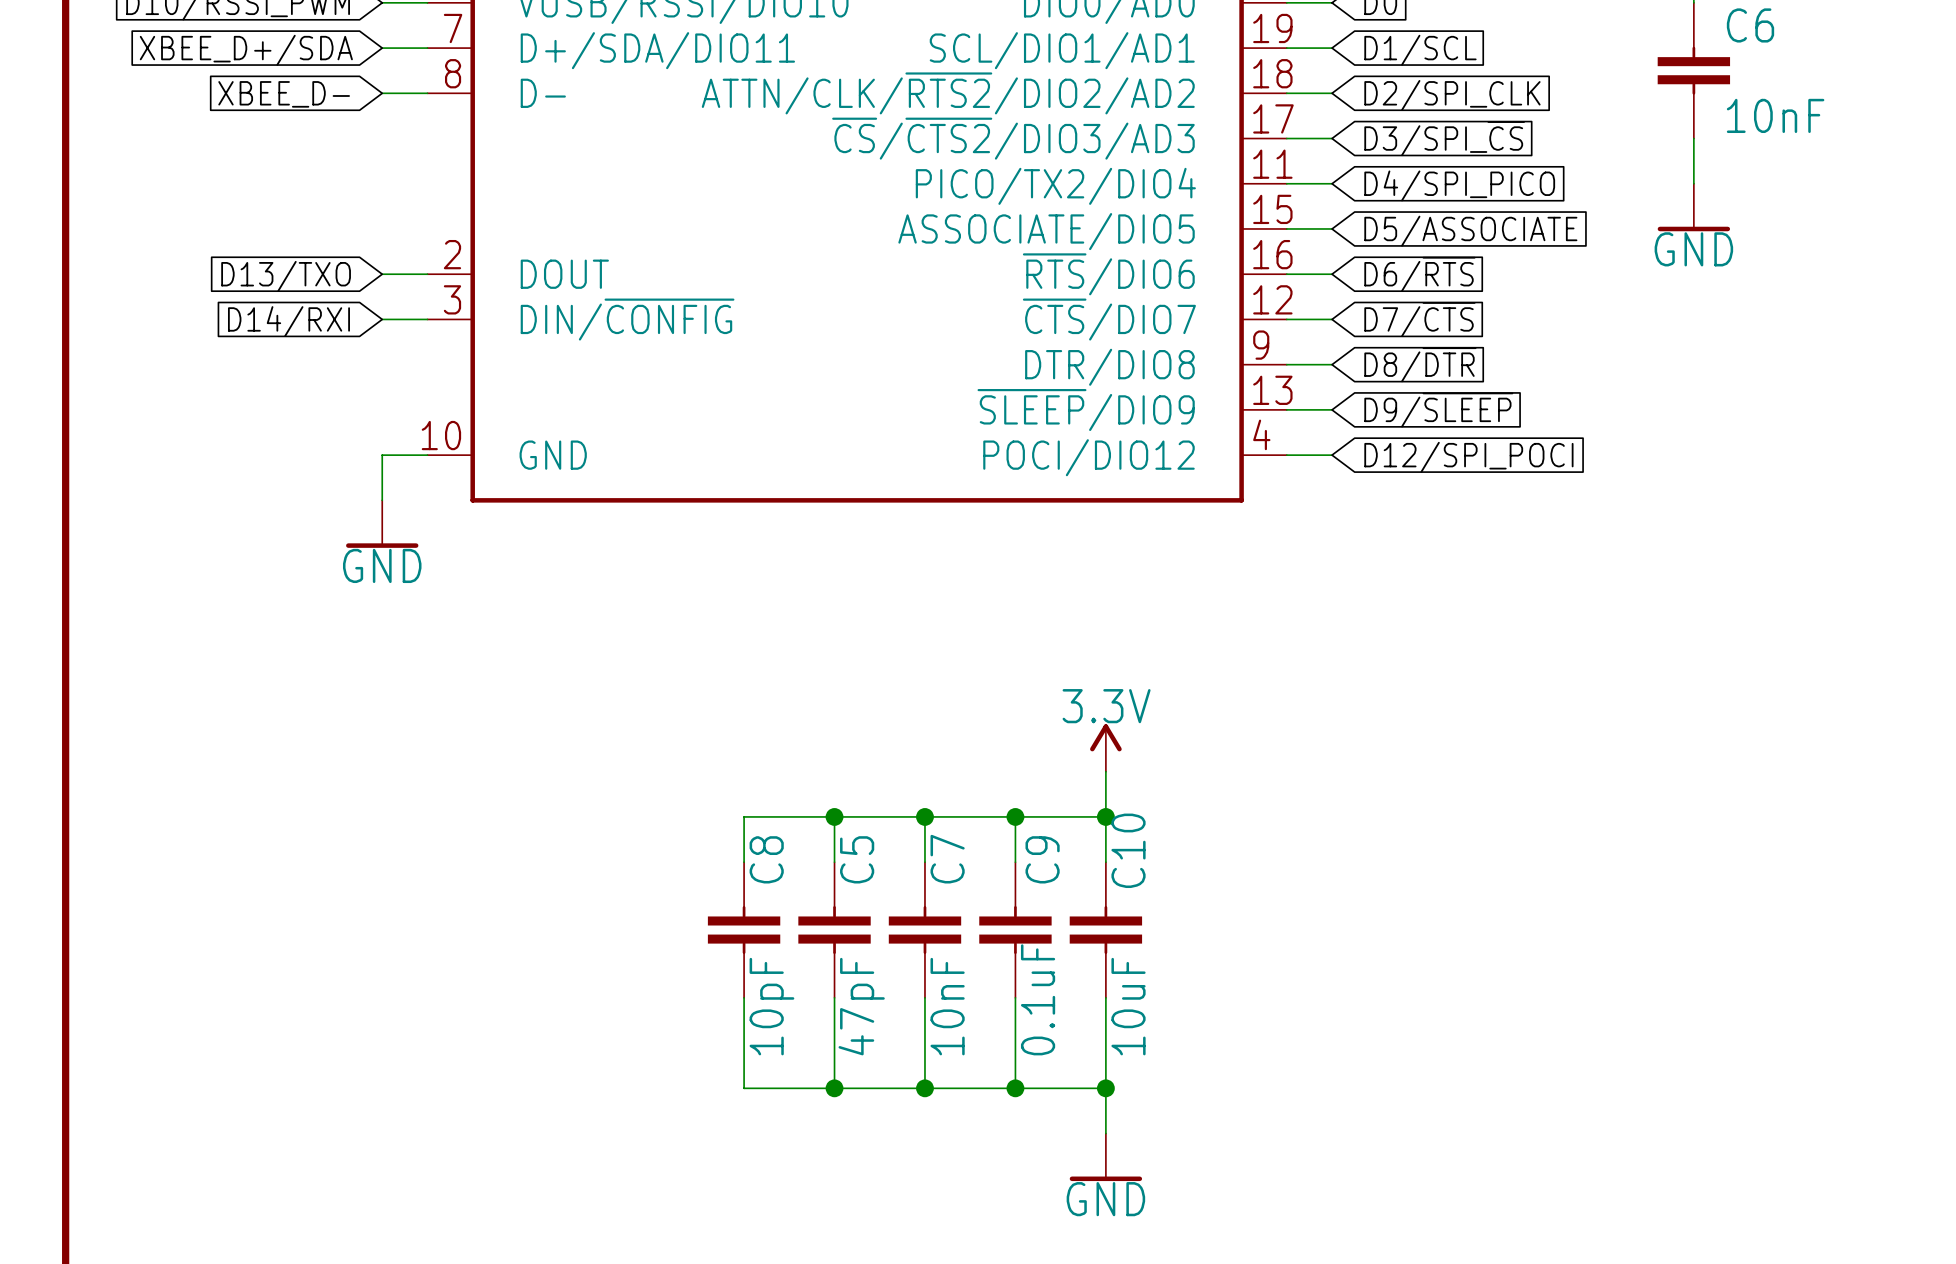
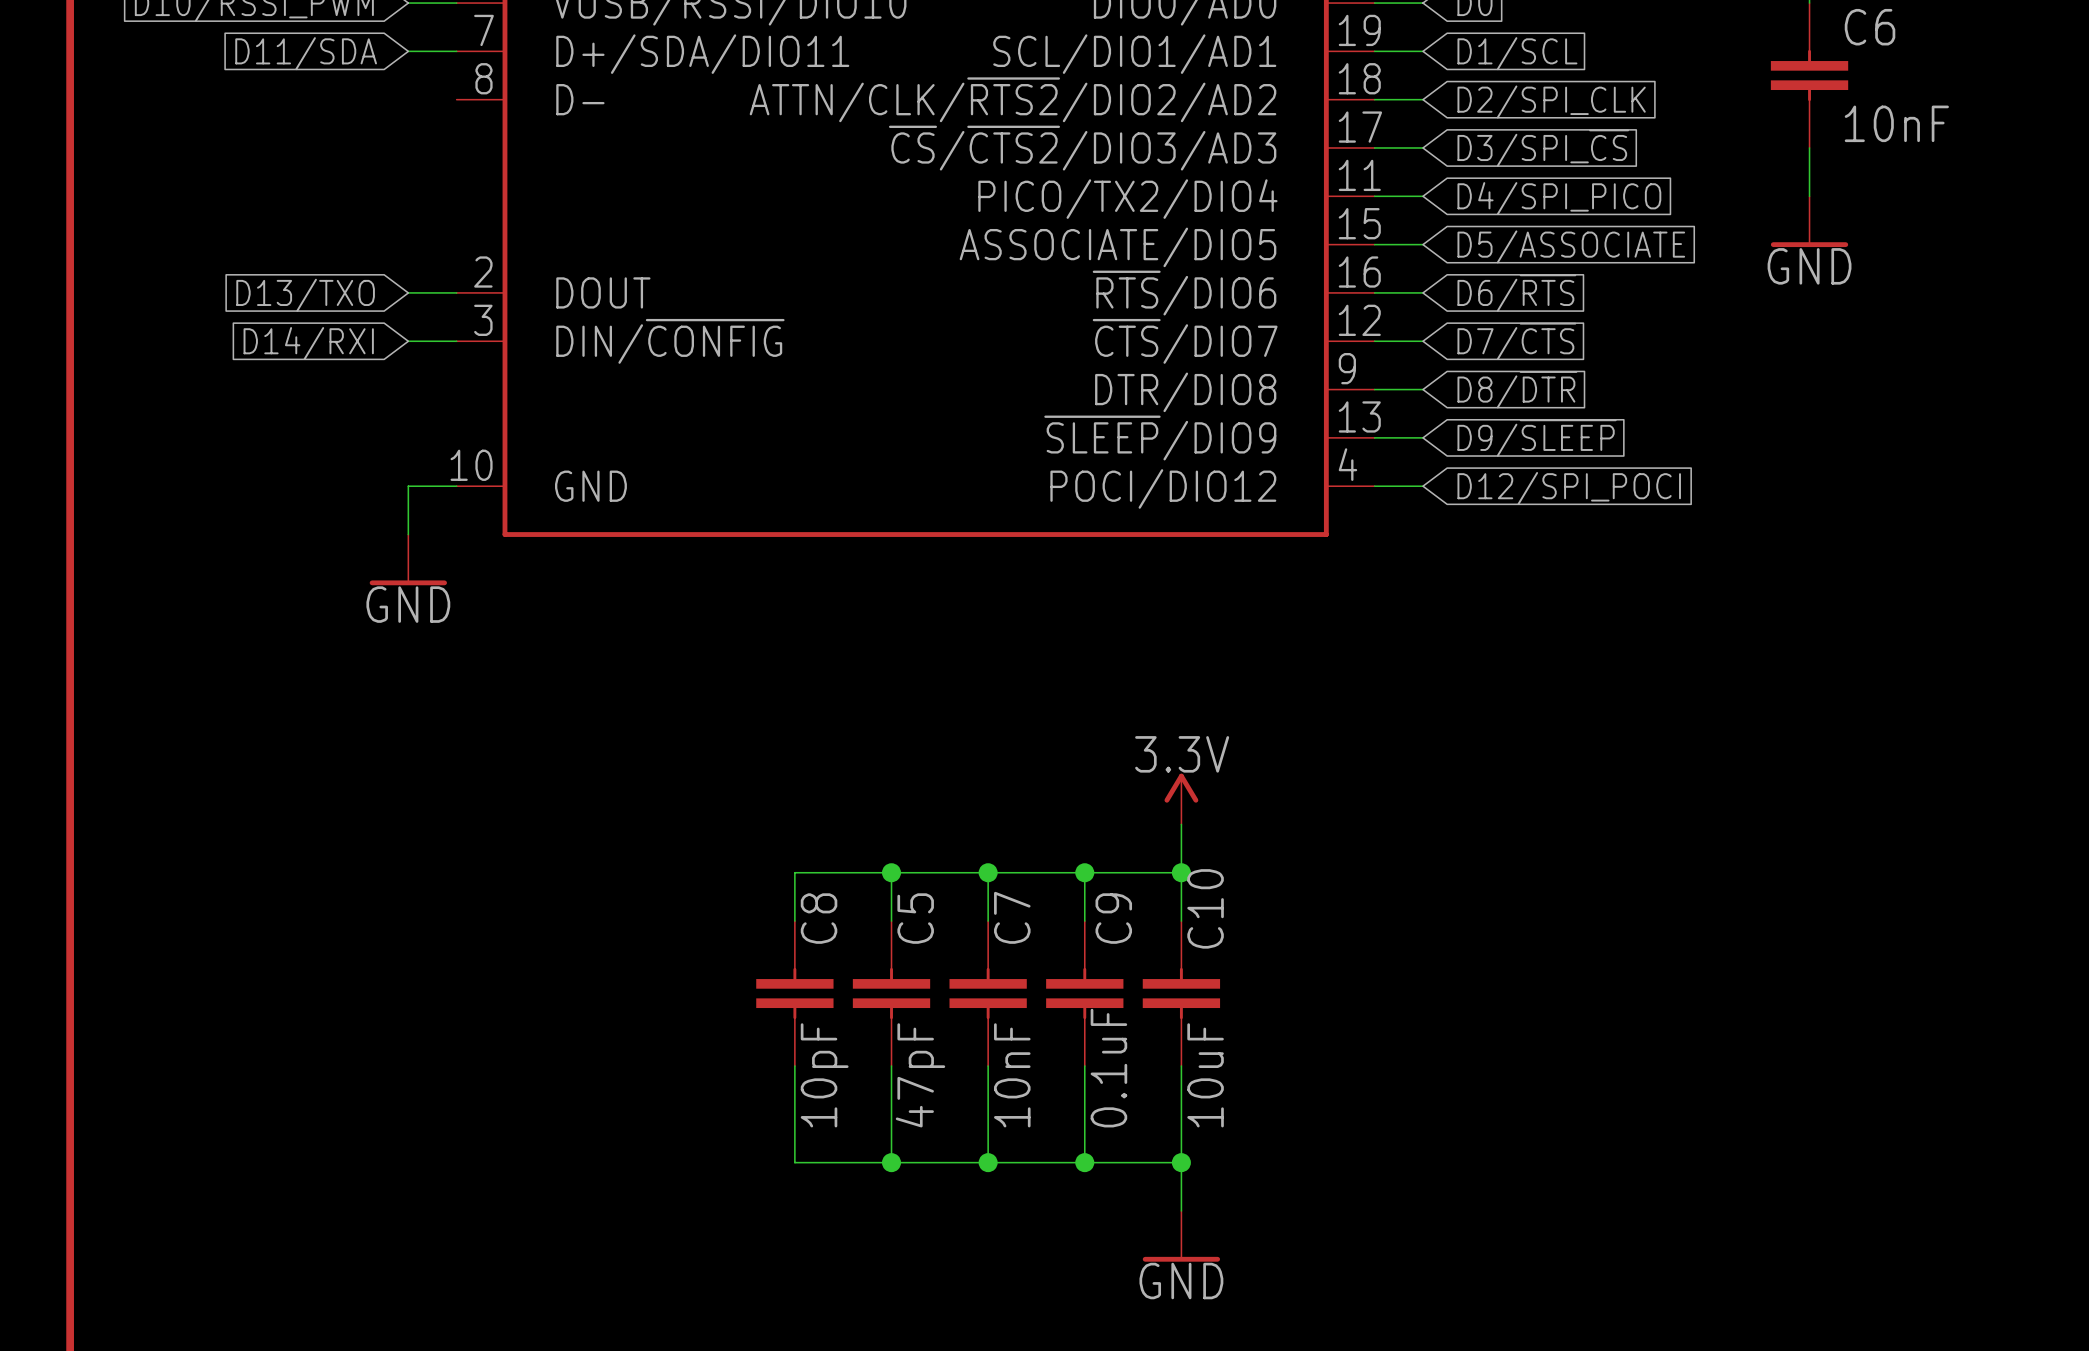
global label: XBEE_D+/SDA (246, 50) -> D11/SDA (306, 53)
wire: (382, 93) (427, 93) -> none
global label: XBEE_D- (284, 94) -> none

